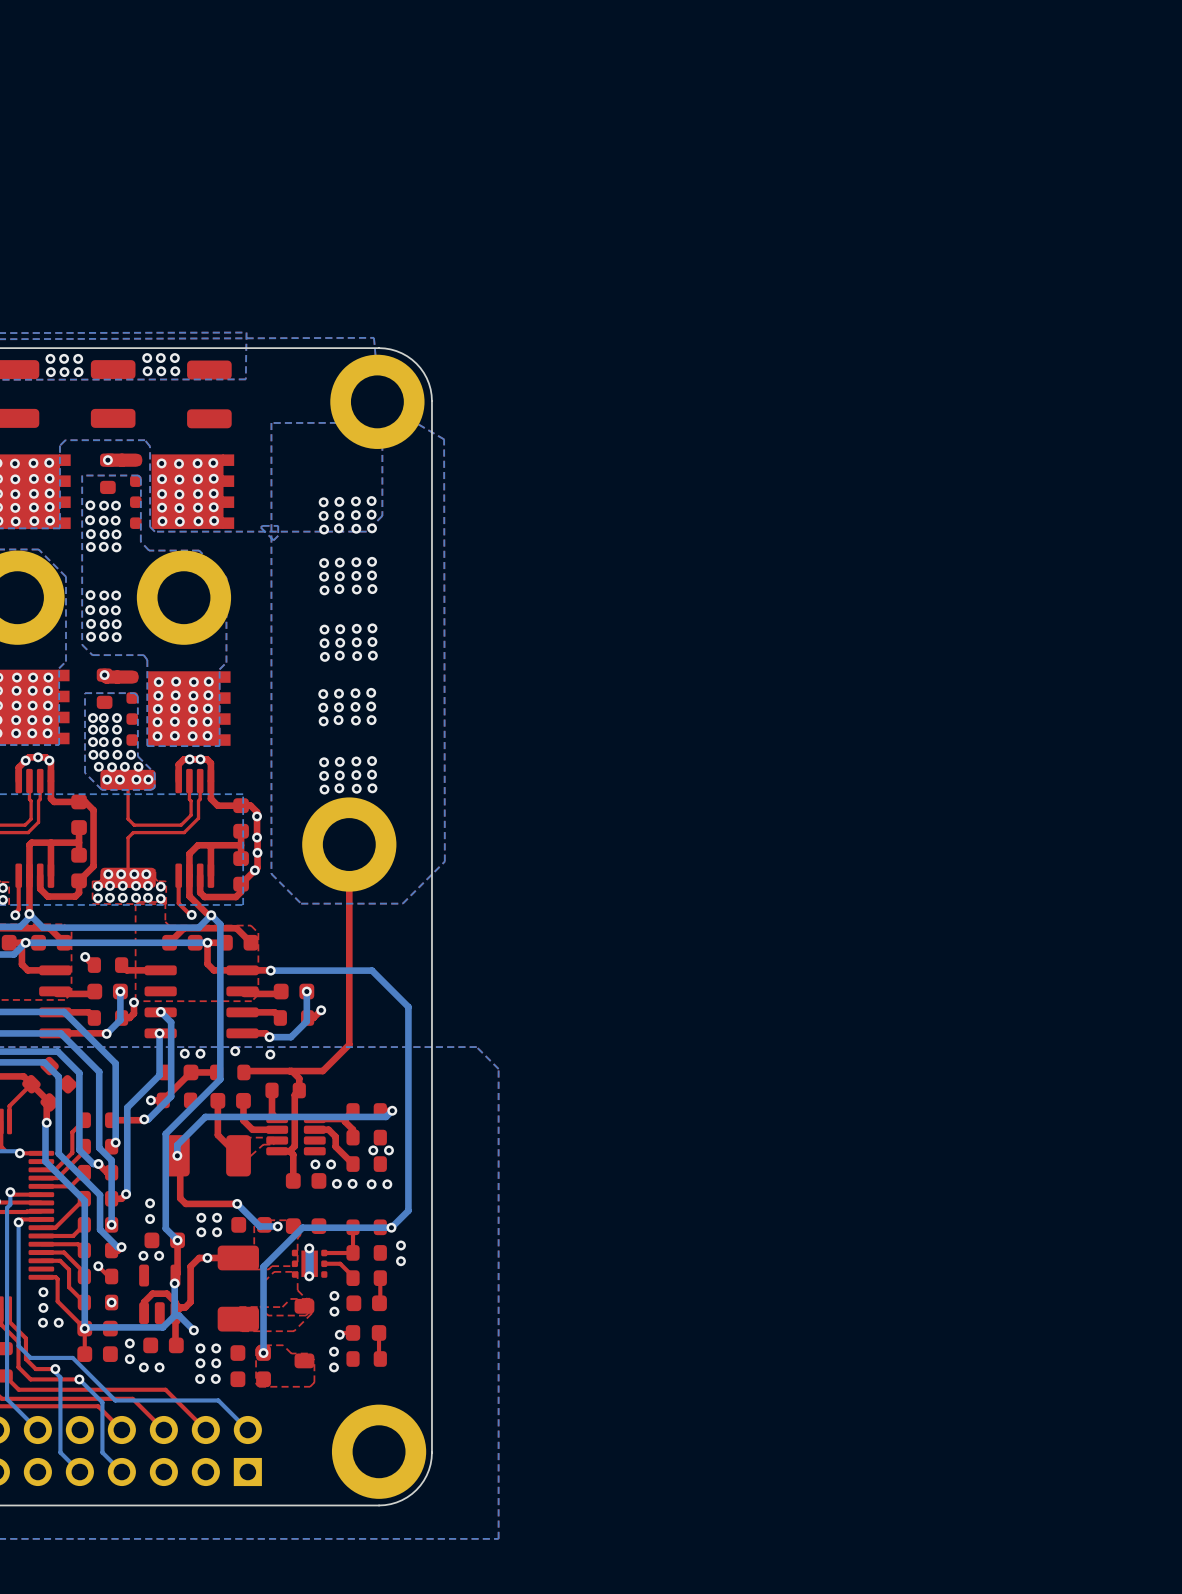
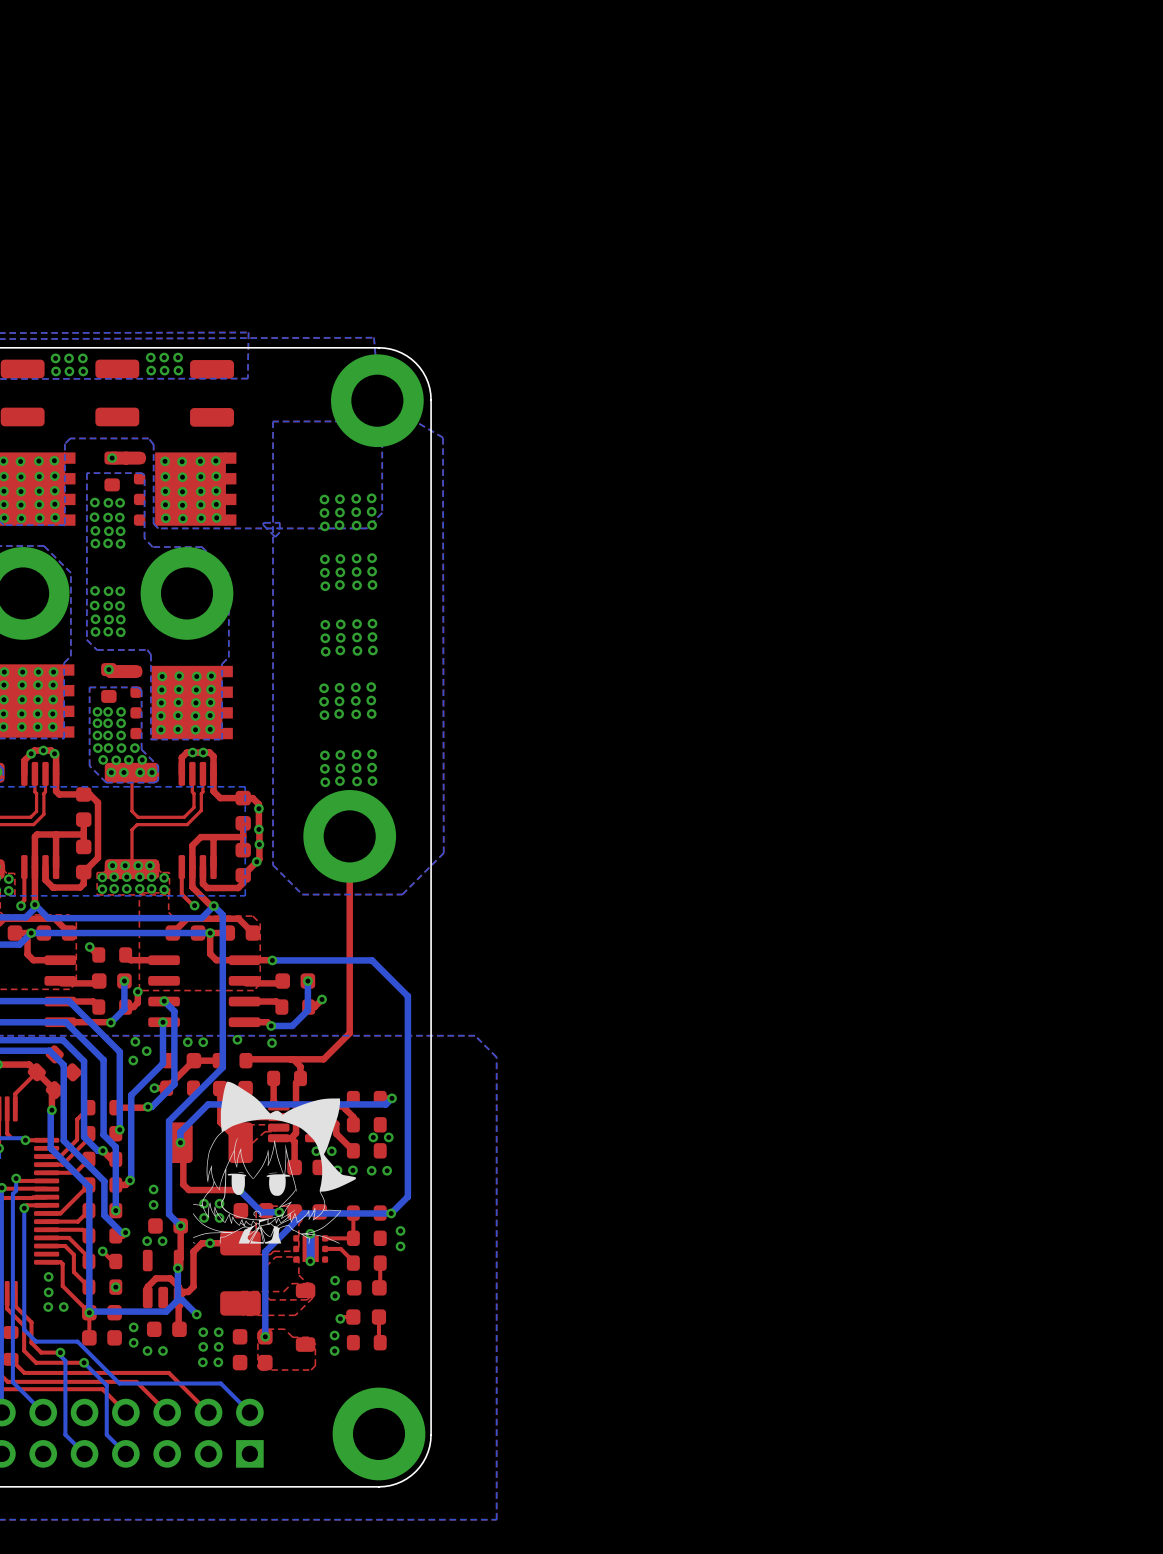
via: none -> (135, 1041)
via: none -> (146, 1051)
via: none -> (133, 1060)
drawing: none -> [193, 1081, 356, 1244]

